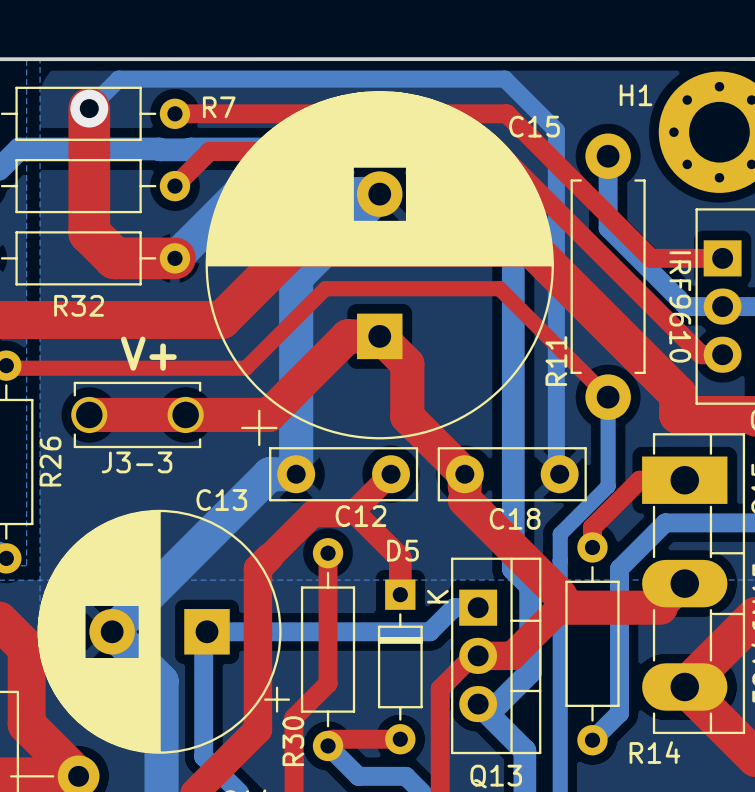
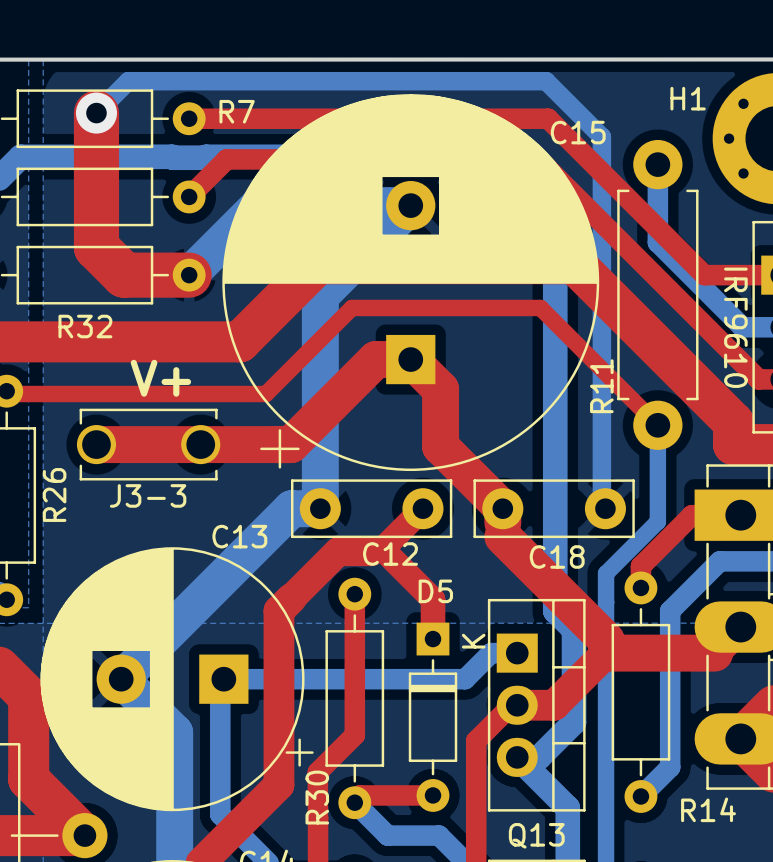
C15 footprint: [205, 91, 554, 447] -> [222, 94, 600, 472]

